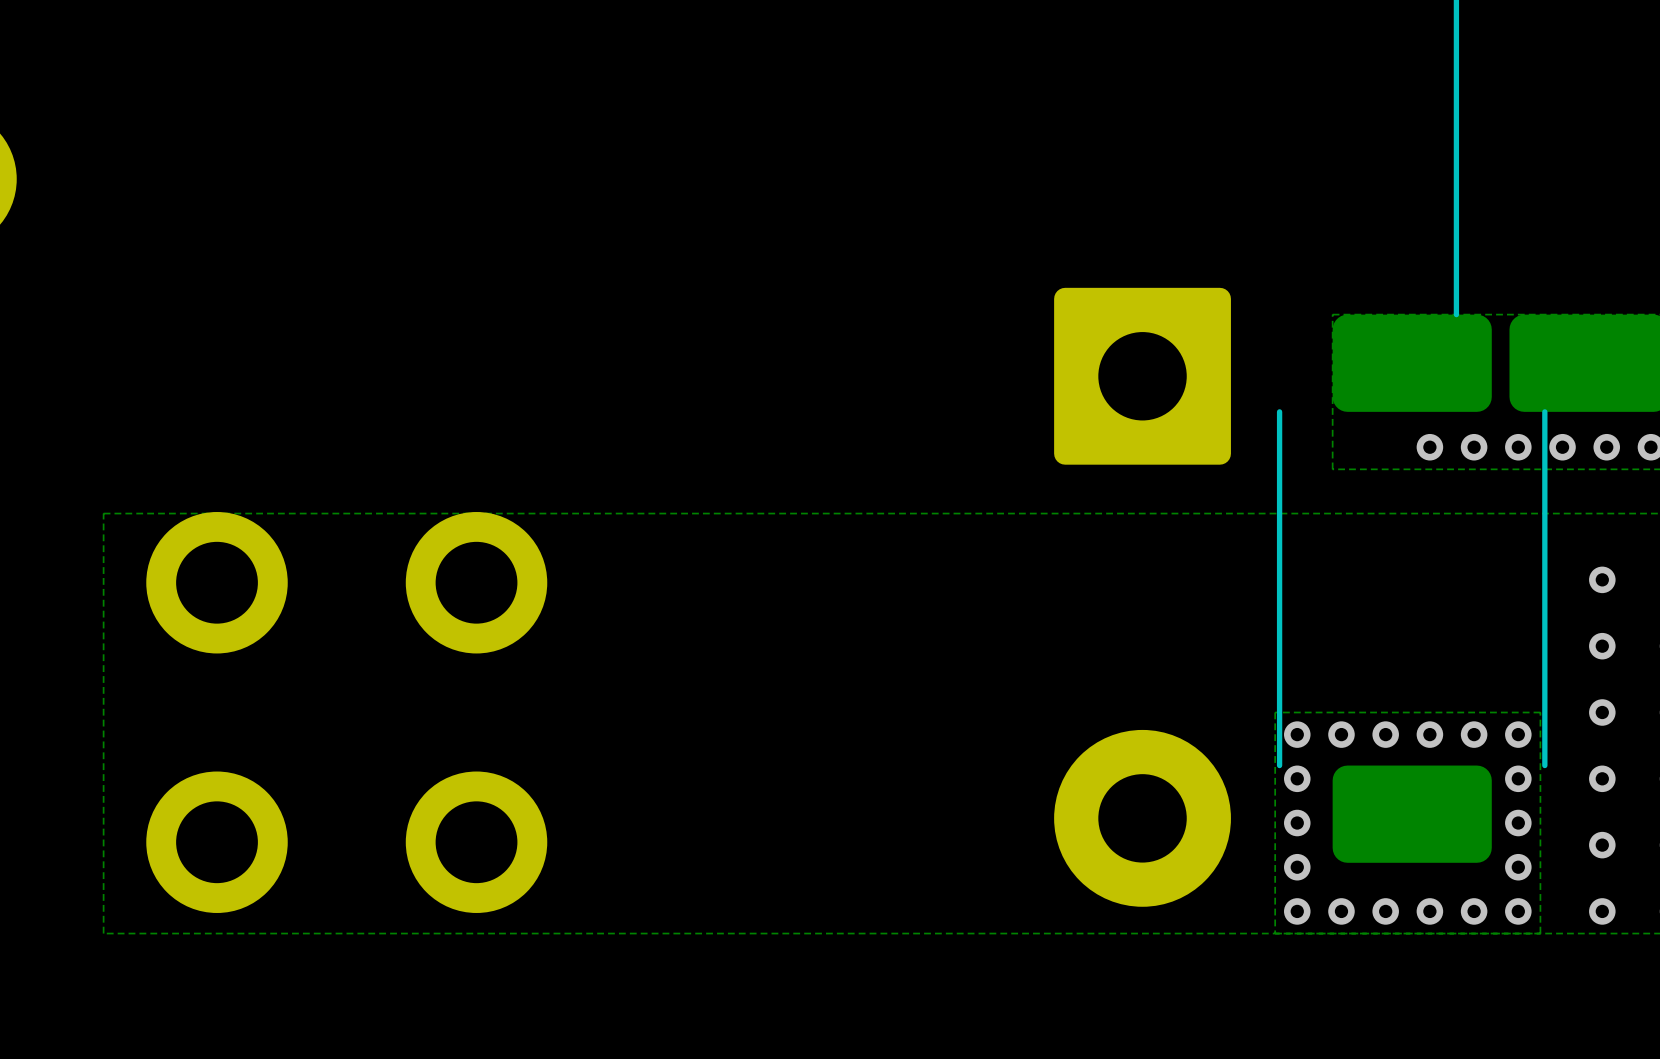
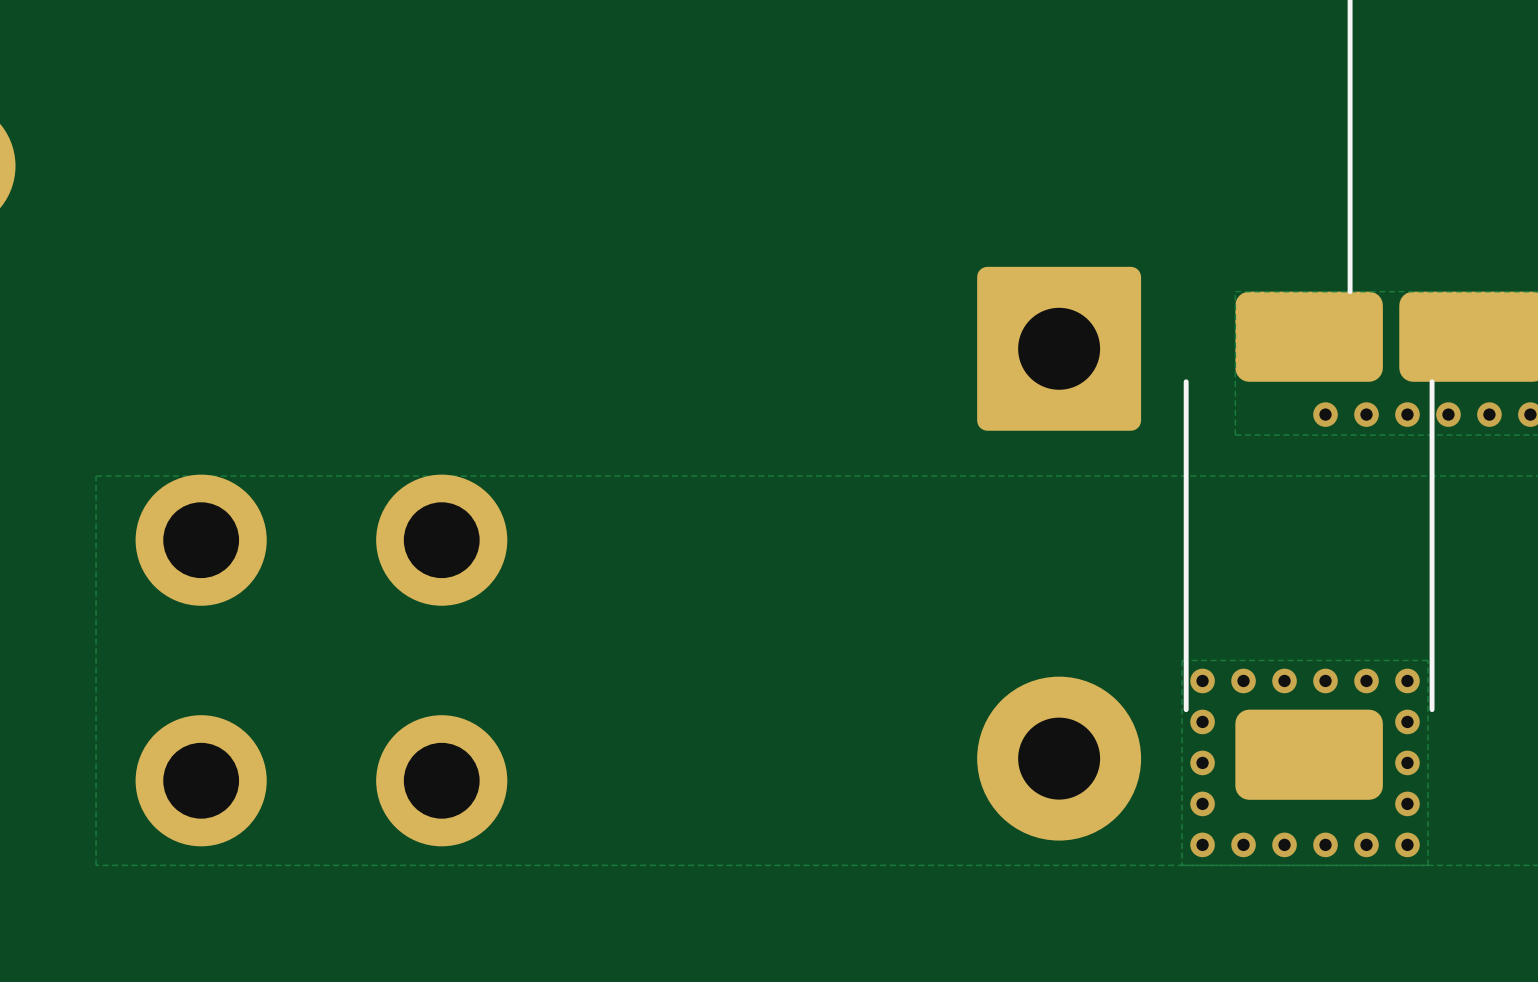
via: (1602, 579) -> none
via: (1602, 646) -> none
via: (1602, 712) -> none
via: (1602, 778) -> none
via: (1602, 845) -> none
via: (1602, 911) -> none

